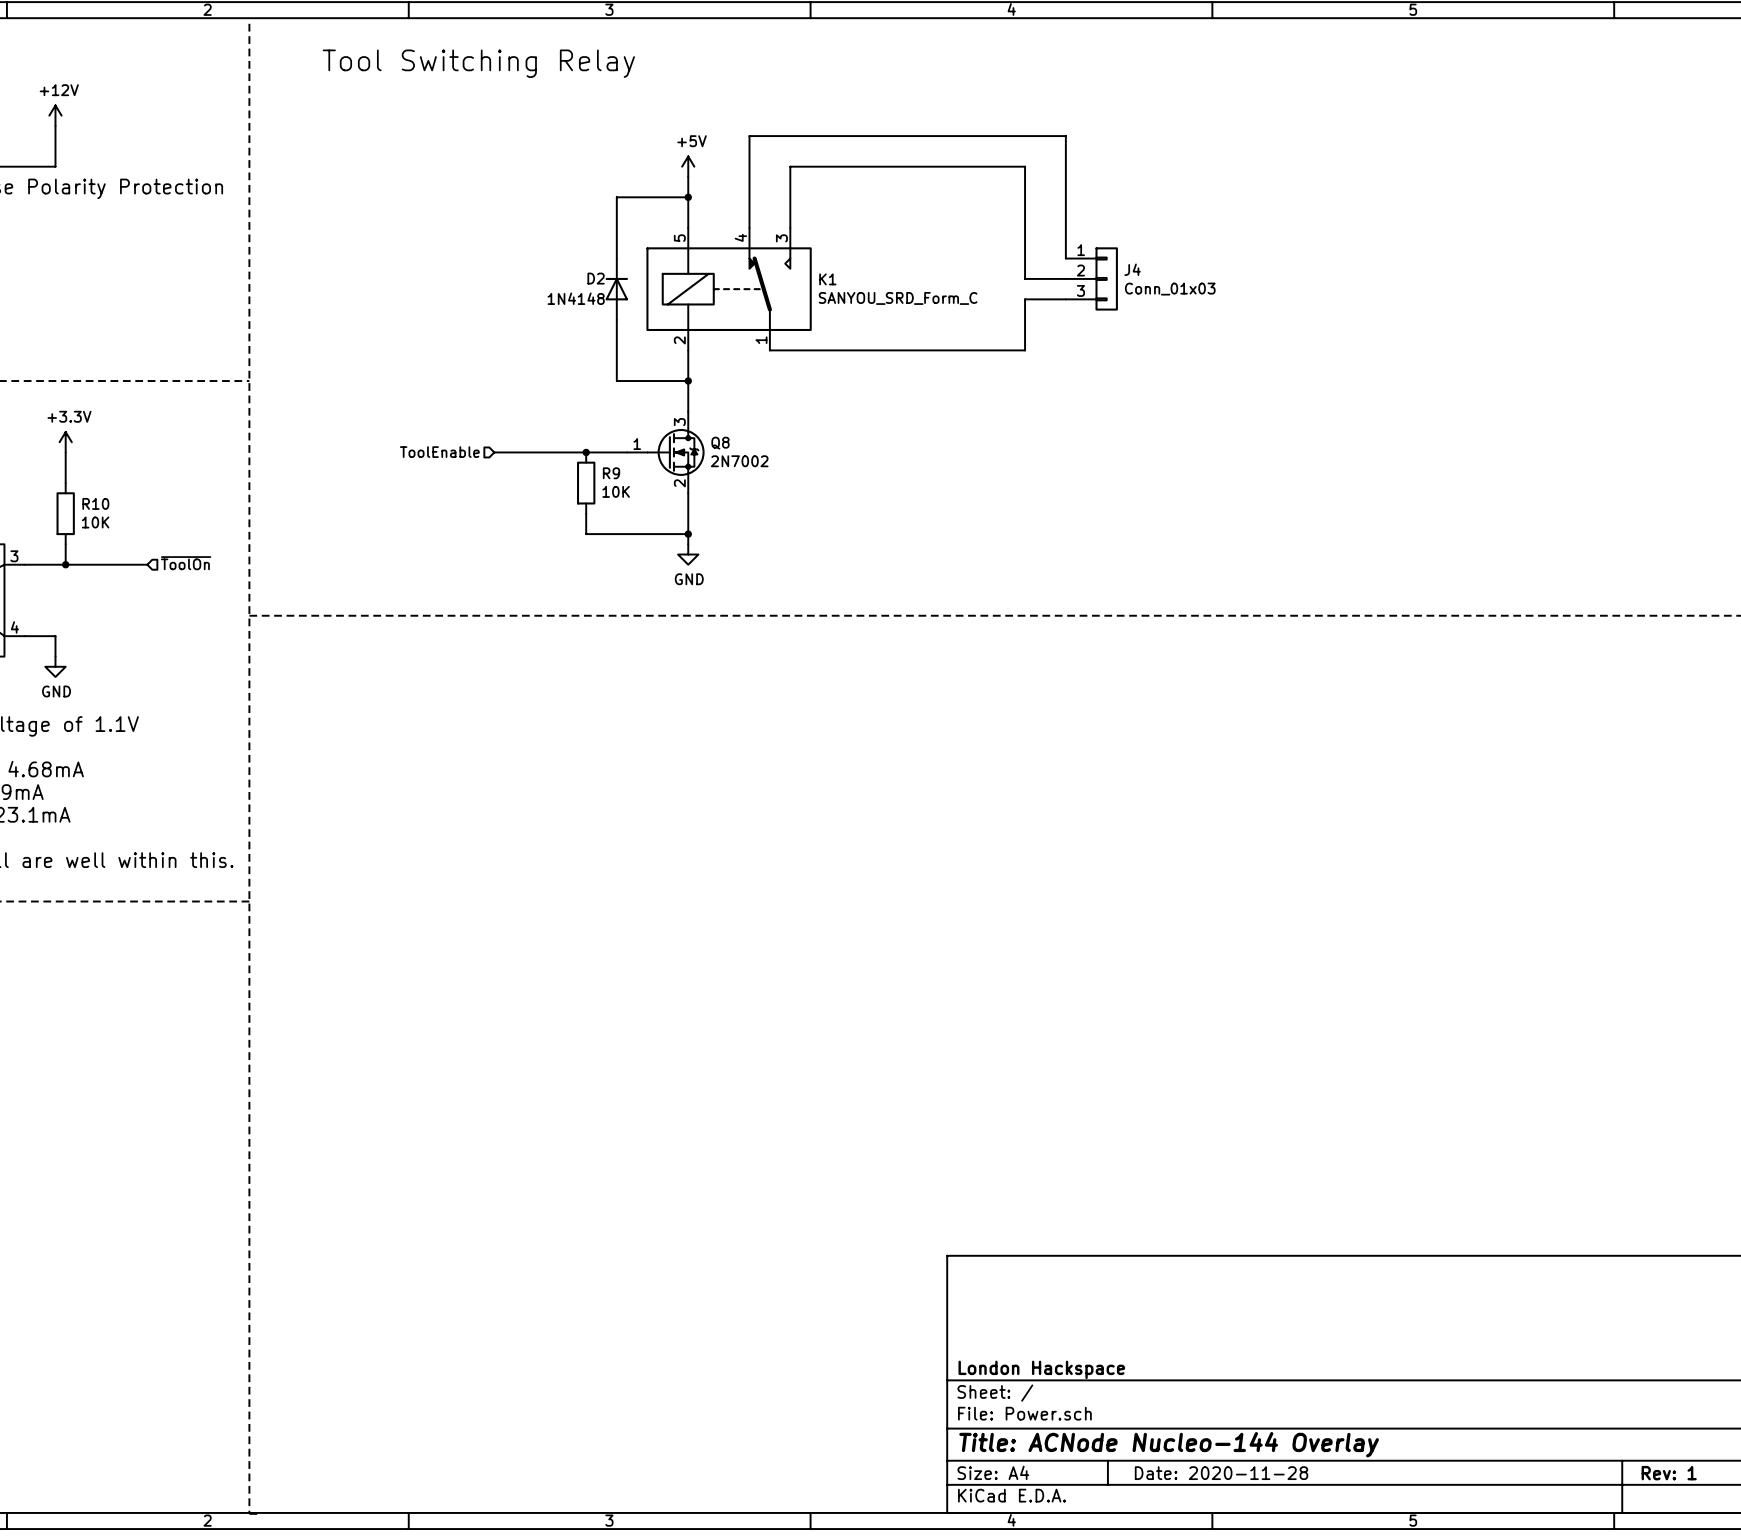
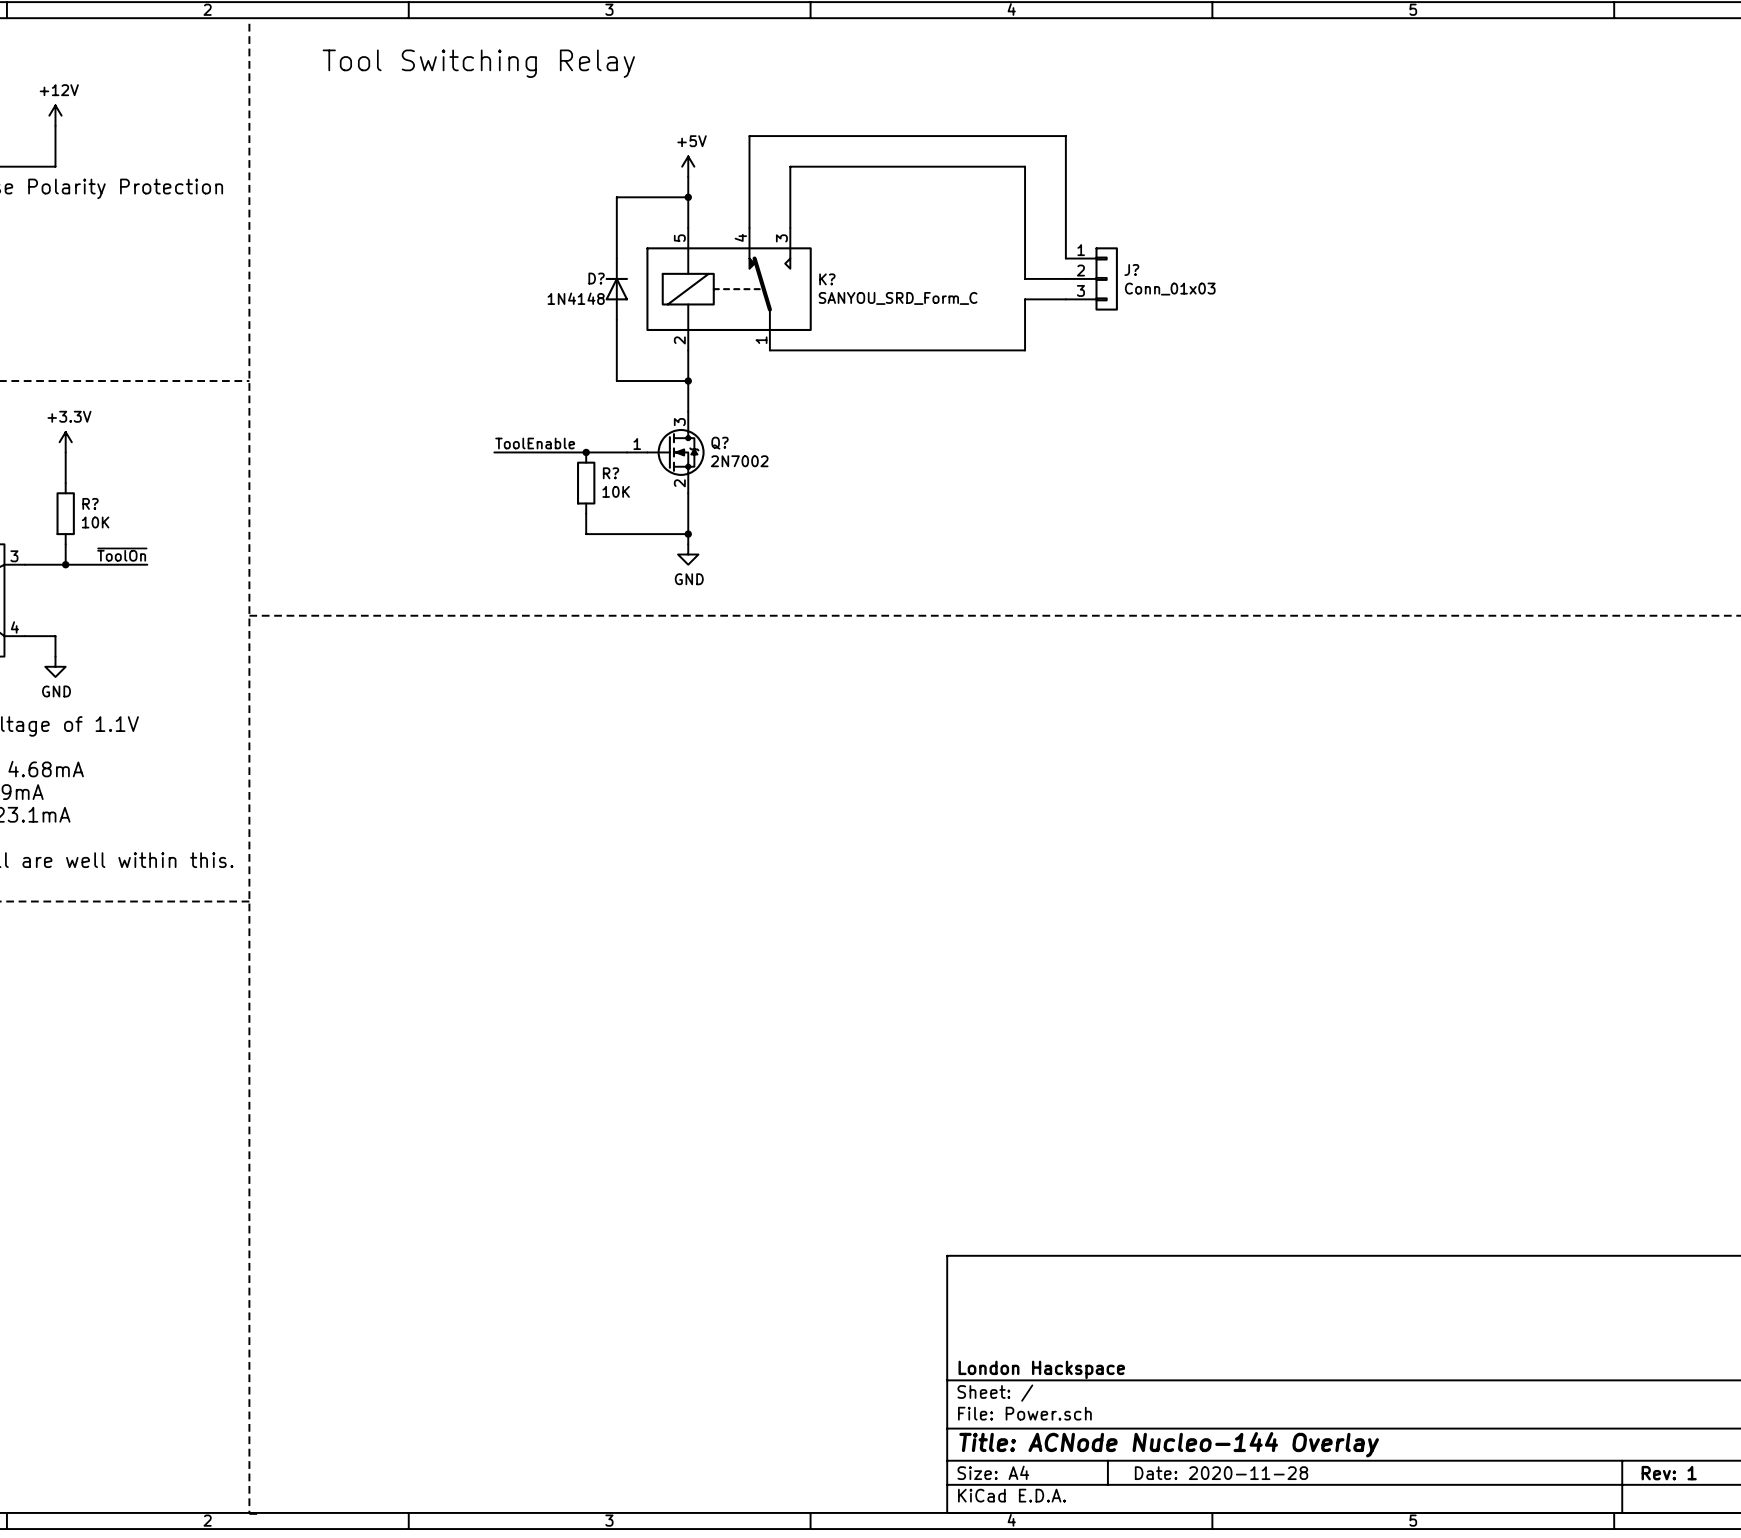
J4 name: J4 (1132, 269) -> J? (1131, 270)
D2 name: D2 (596, 278) -> D? (596, 278)
K1 name: K1 (827, 279) -> K? (827, 279)
label: none -> ToolEnable (535, 443)
Q8 name: Q8 (720, 443) -> Q? (720, 443)
hierarchical label: ToolEnable (439, 452) -> none
R9 name: R9 (611, 473) -> R? (611, 473)
R10 name: R10 (95, 503) -> R? (90, 503)
label: none -> ~{ToolOn} (122, 554)
hierarchical label: ~{ToolOn} (186, 563) -> none

